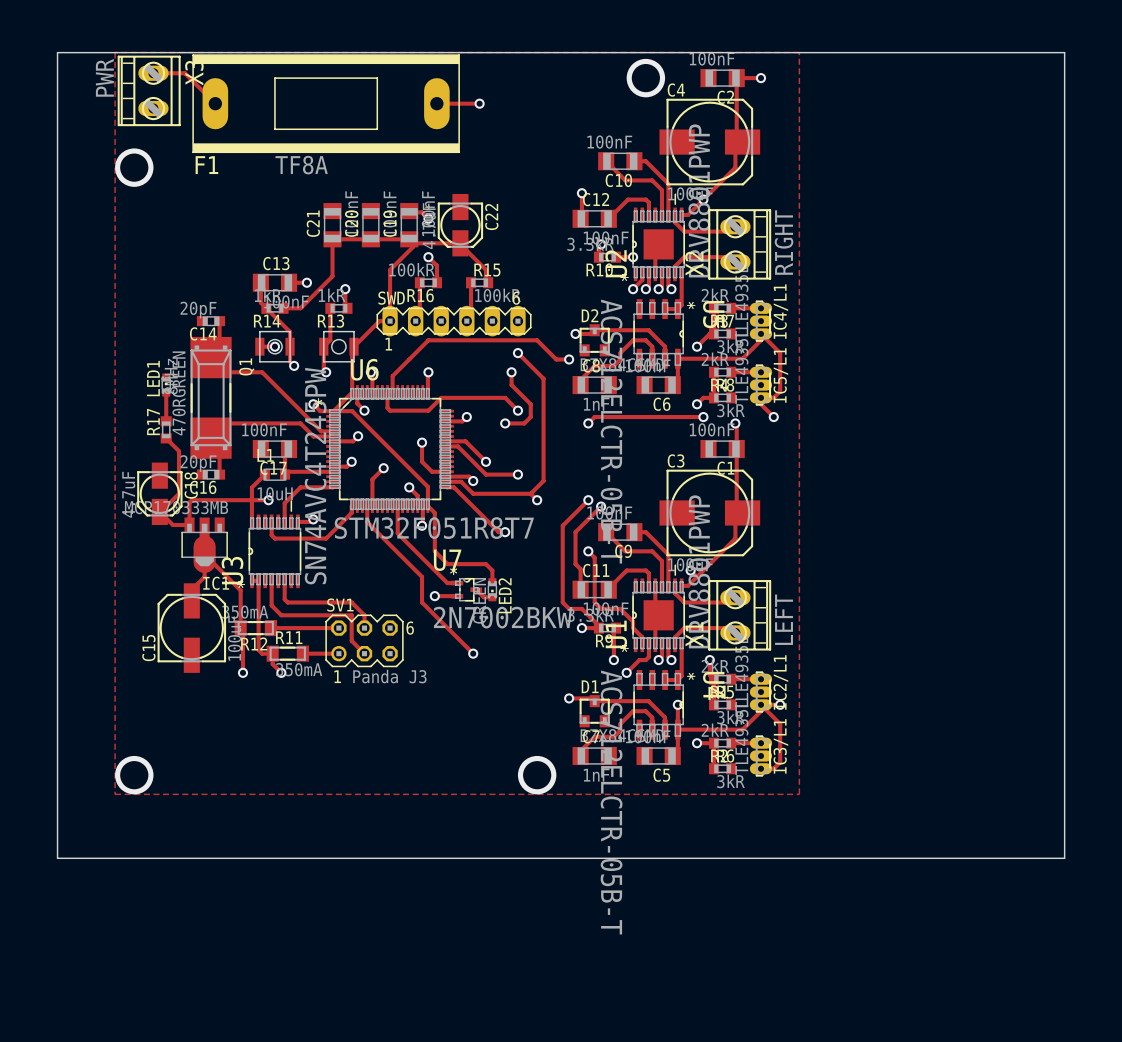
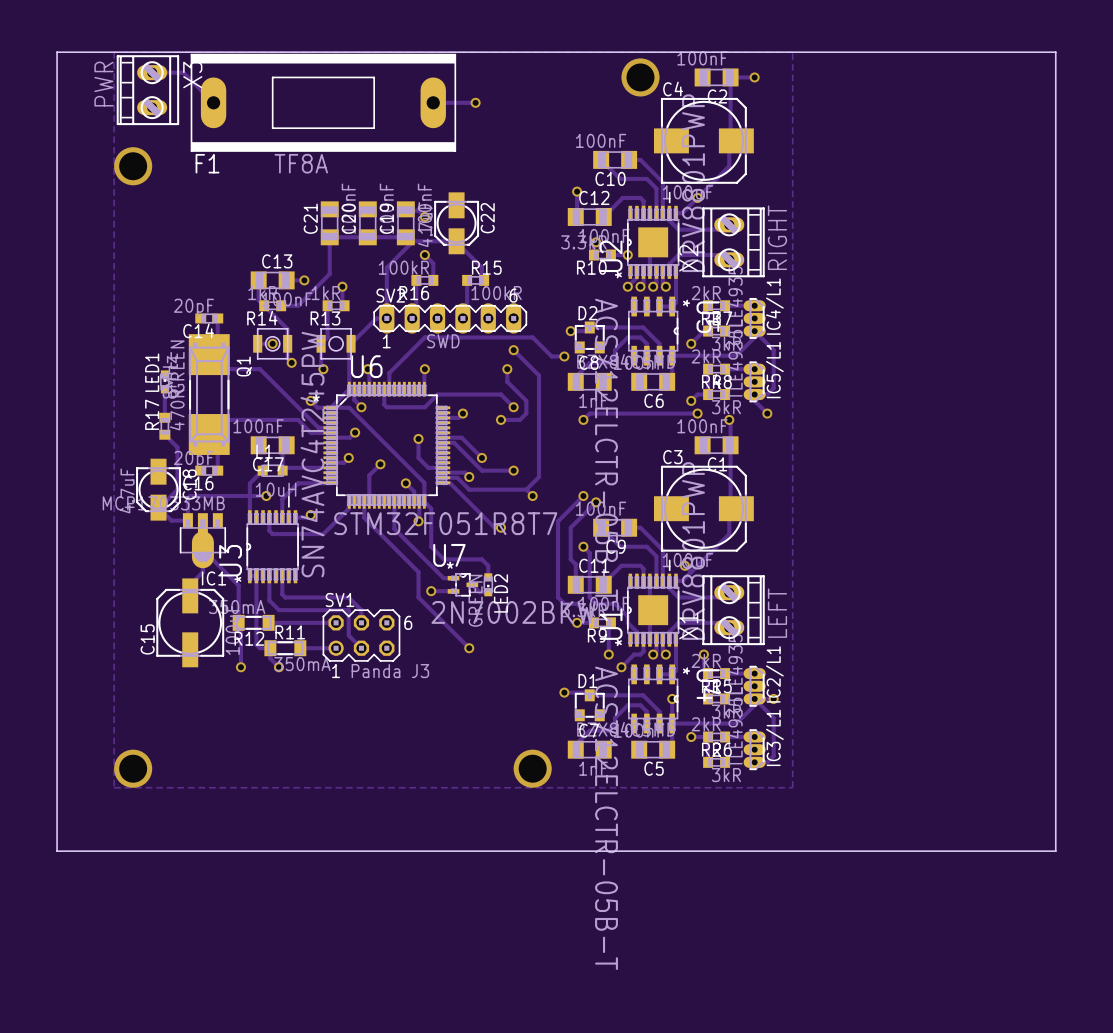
SWD name: SWD (391, 298) -> SV2 (390, 295)
SWD value: none -> SWD (443, 341)

